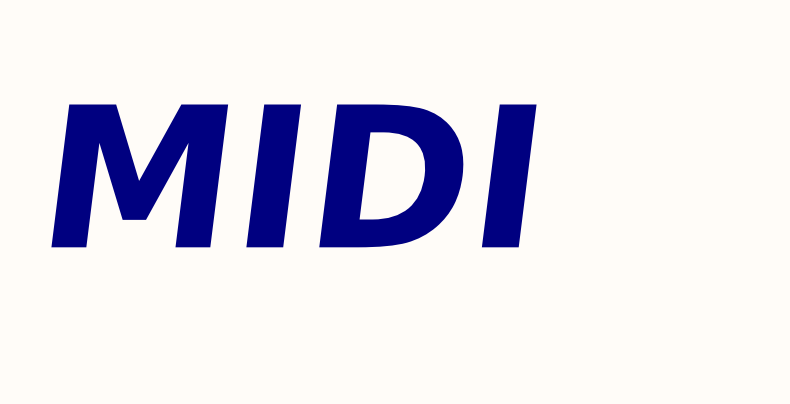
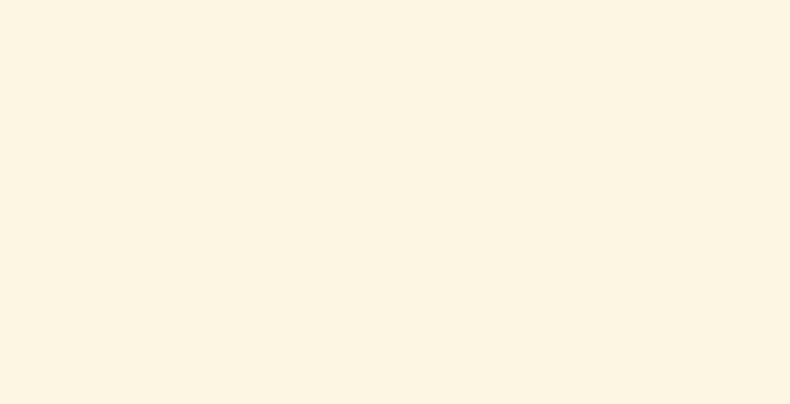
text: MIDI (293, 175) -> none

